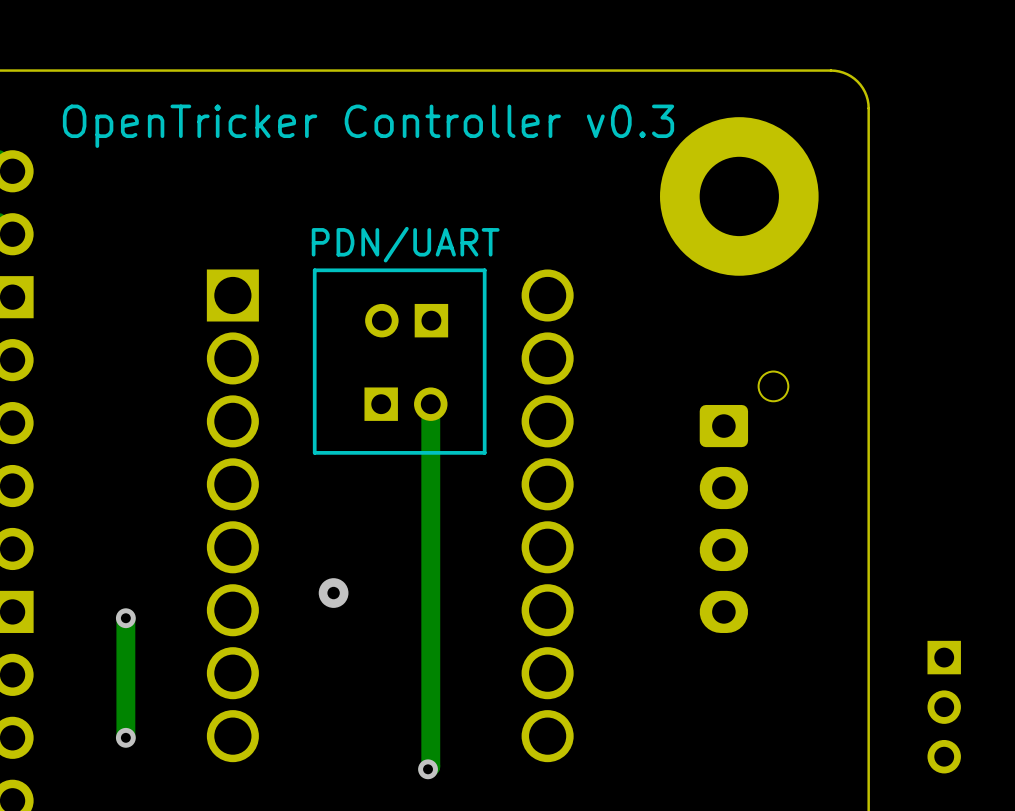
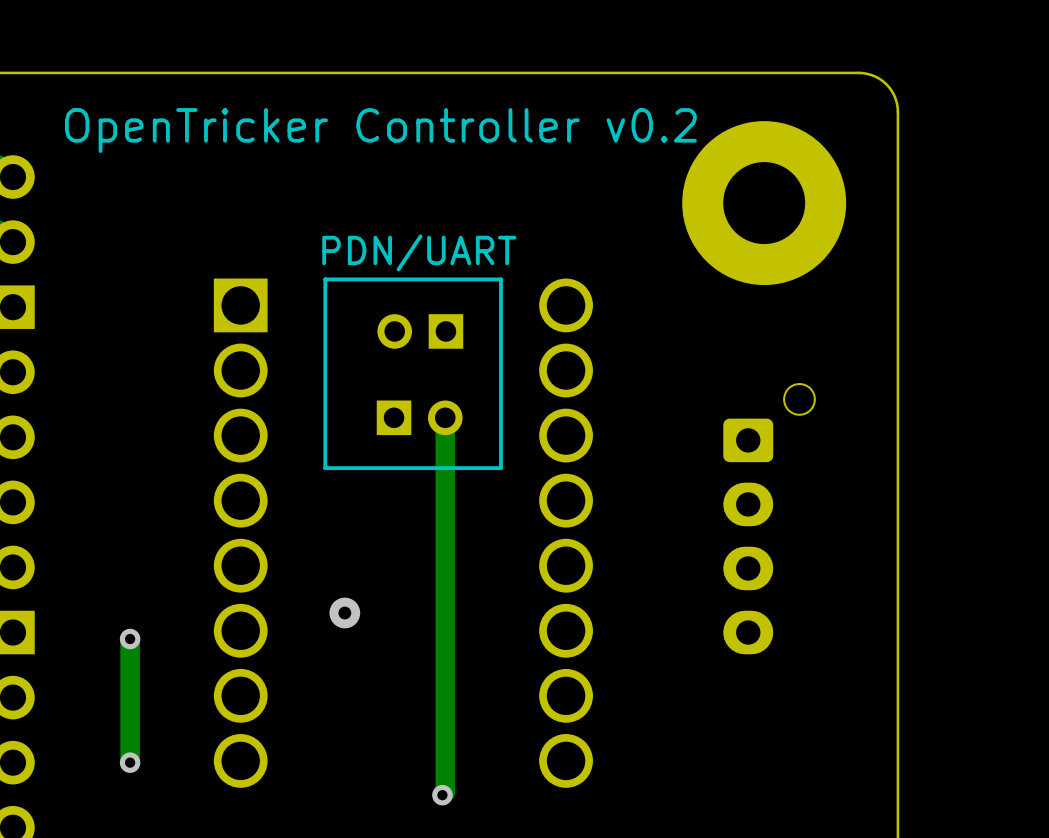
text: OpenTricker Controller v0.3 (368, 126) -> OpenTricker Controller v0.2 (380, 130)
part: (944, 707) -> none

